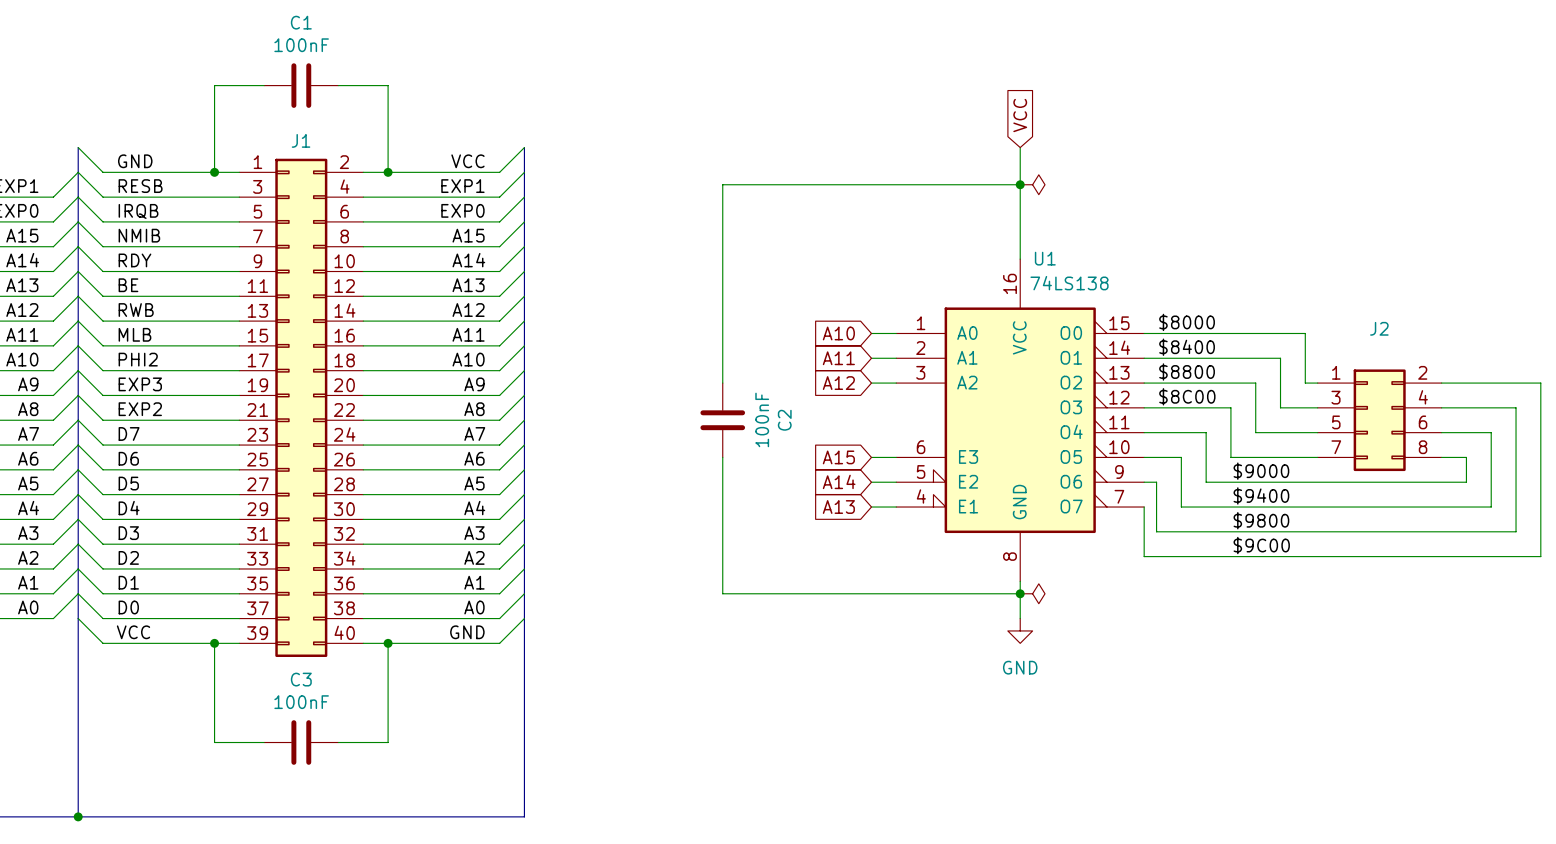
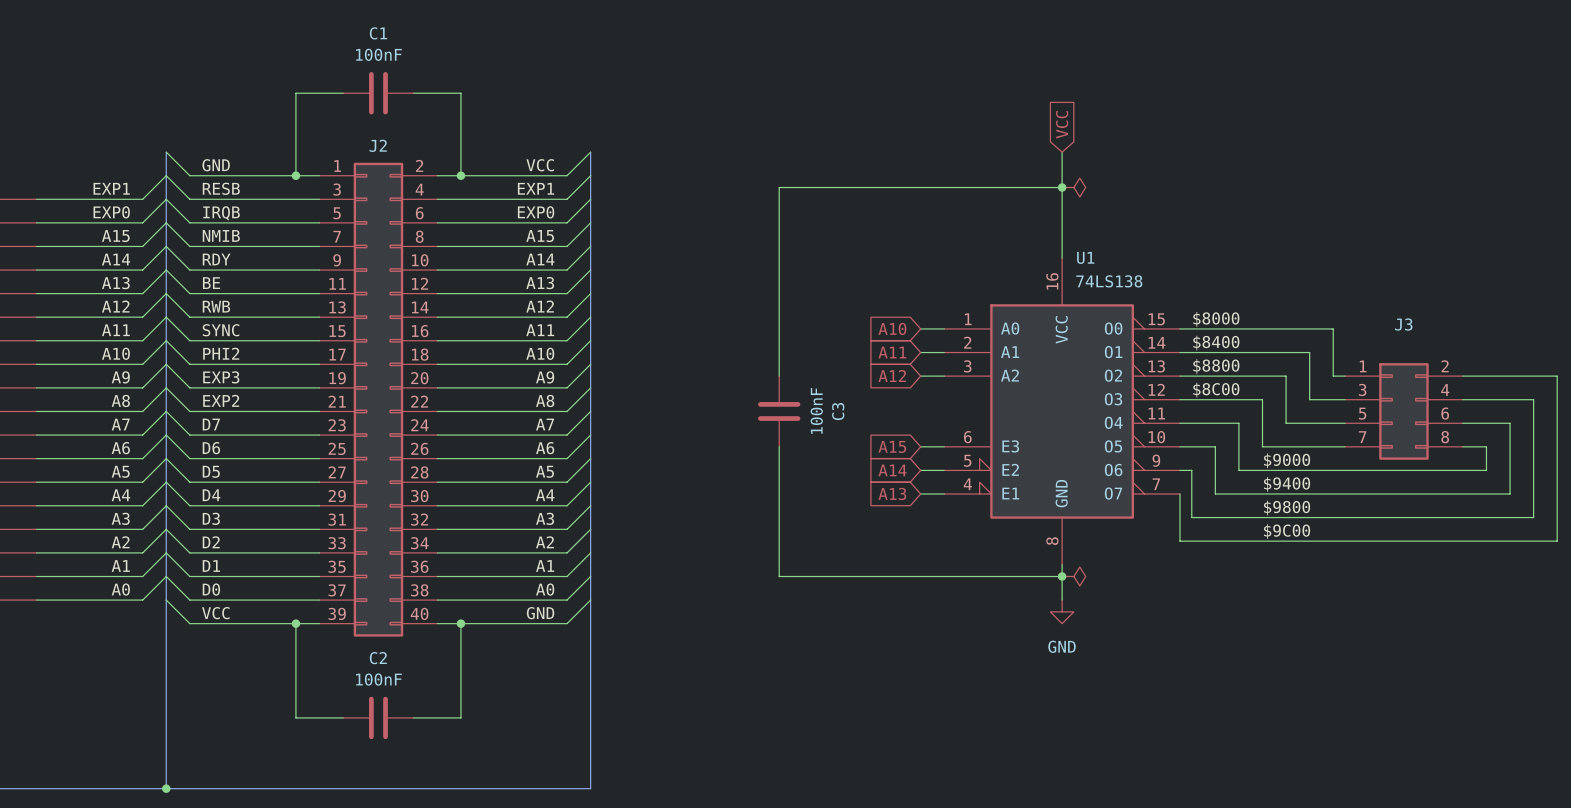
J1 name: J1 (301, 140) -> J2 (378, 145)
J2 name: J2 (1379, 328) -> J3 (1403, 324)
label: MLB (134, 334) -> SYNC (221, 330)
C2 name: C2 (784, 420) -> C3 (838, 411)
C3 name: C3 (301, 679) -> C2 (378, 658)

